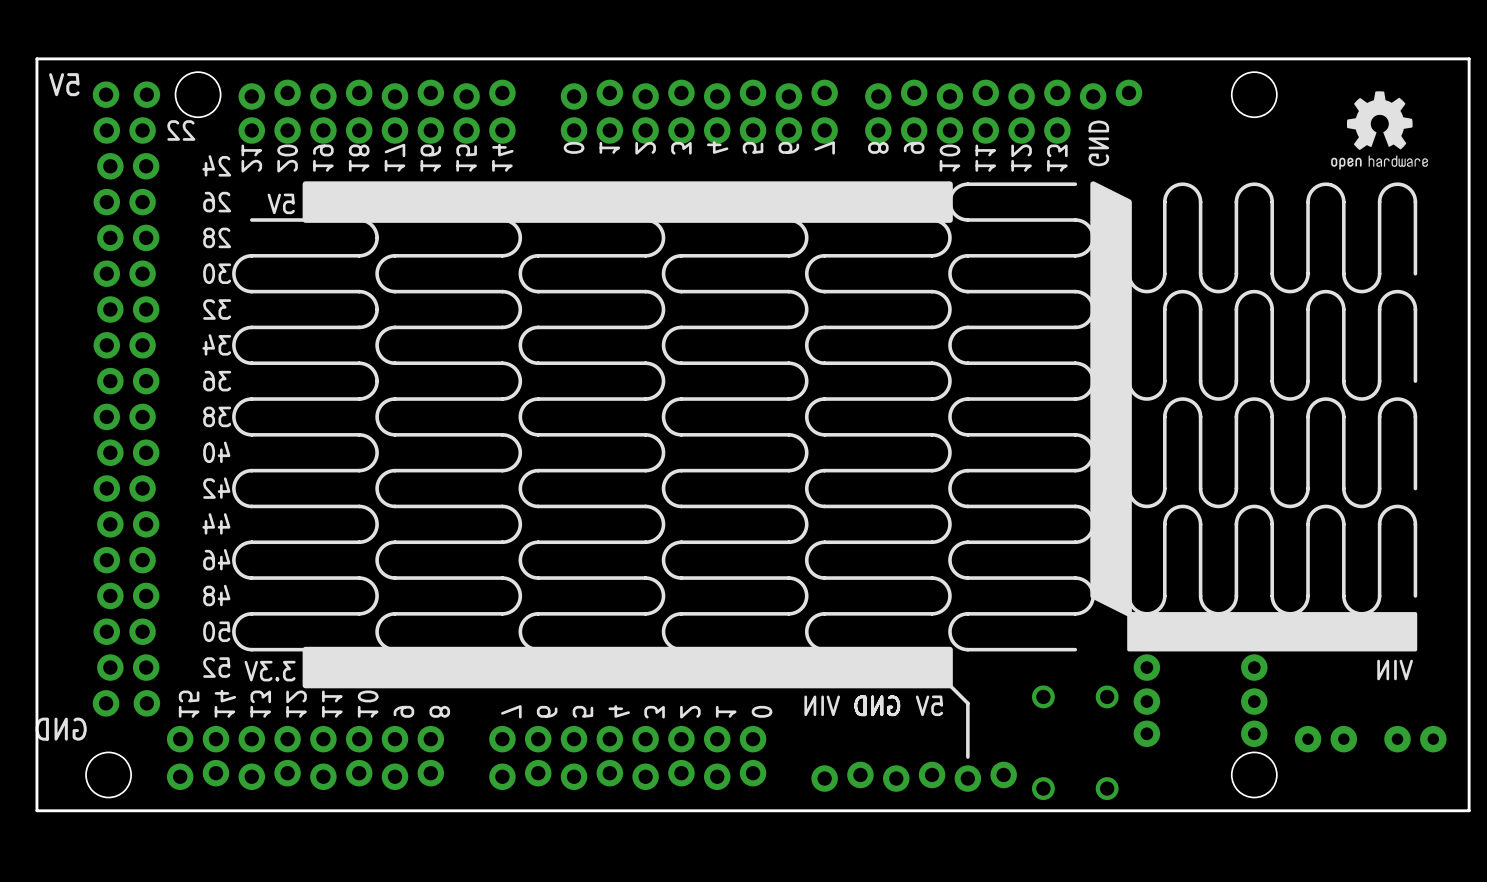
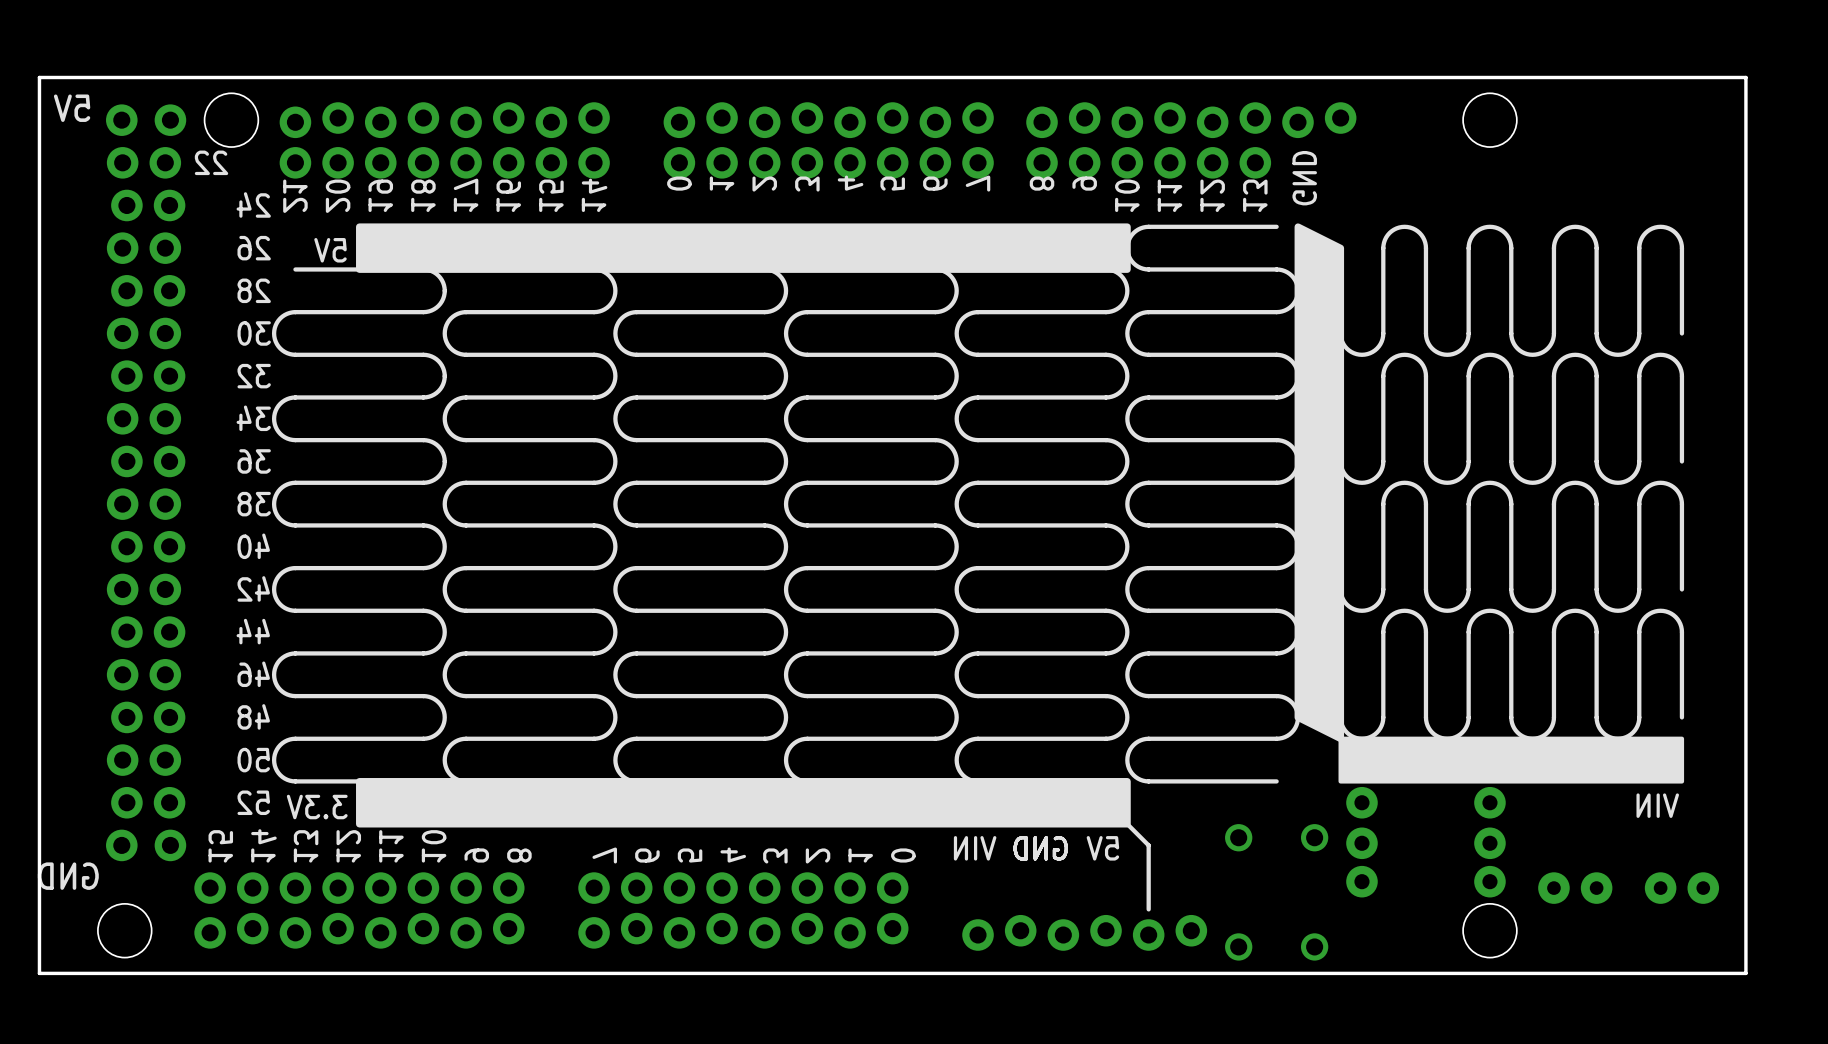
drawing: [1331, 91, 1429, 170] -> none

